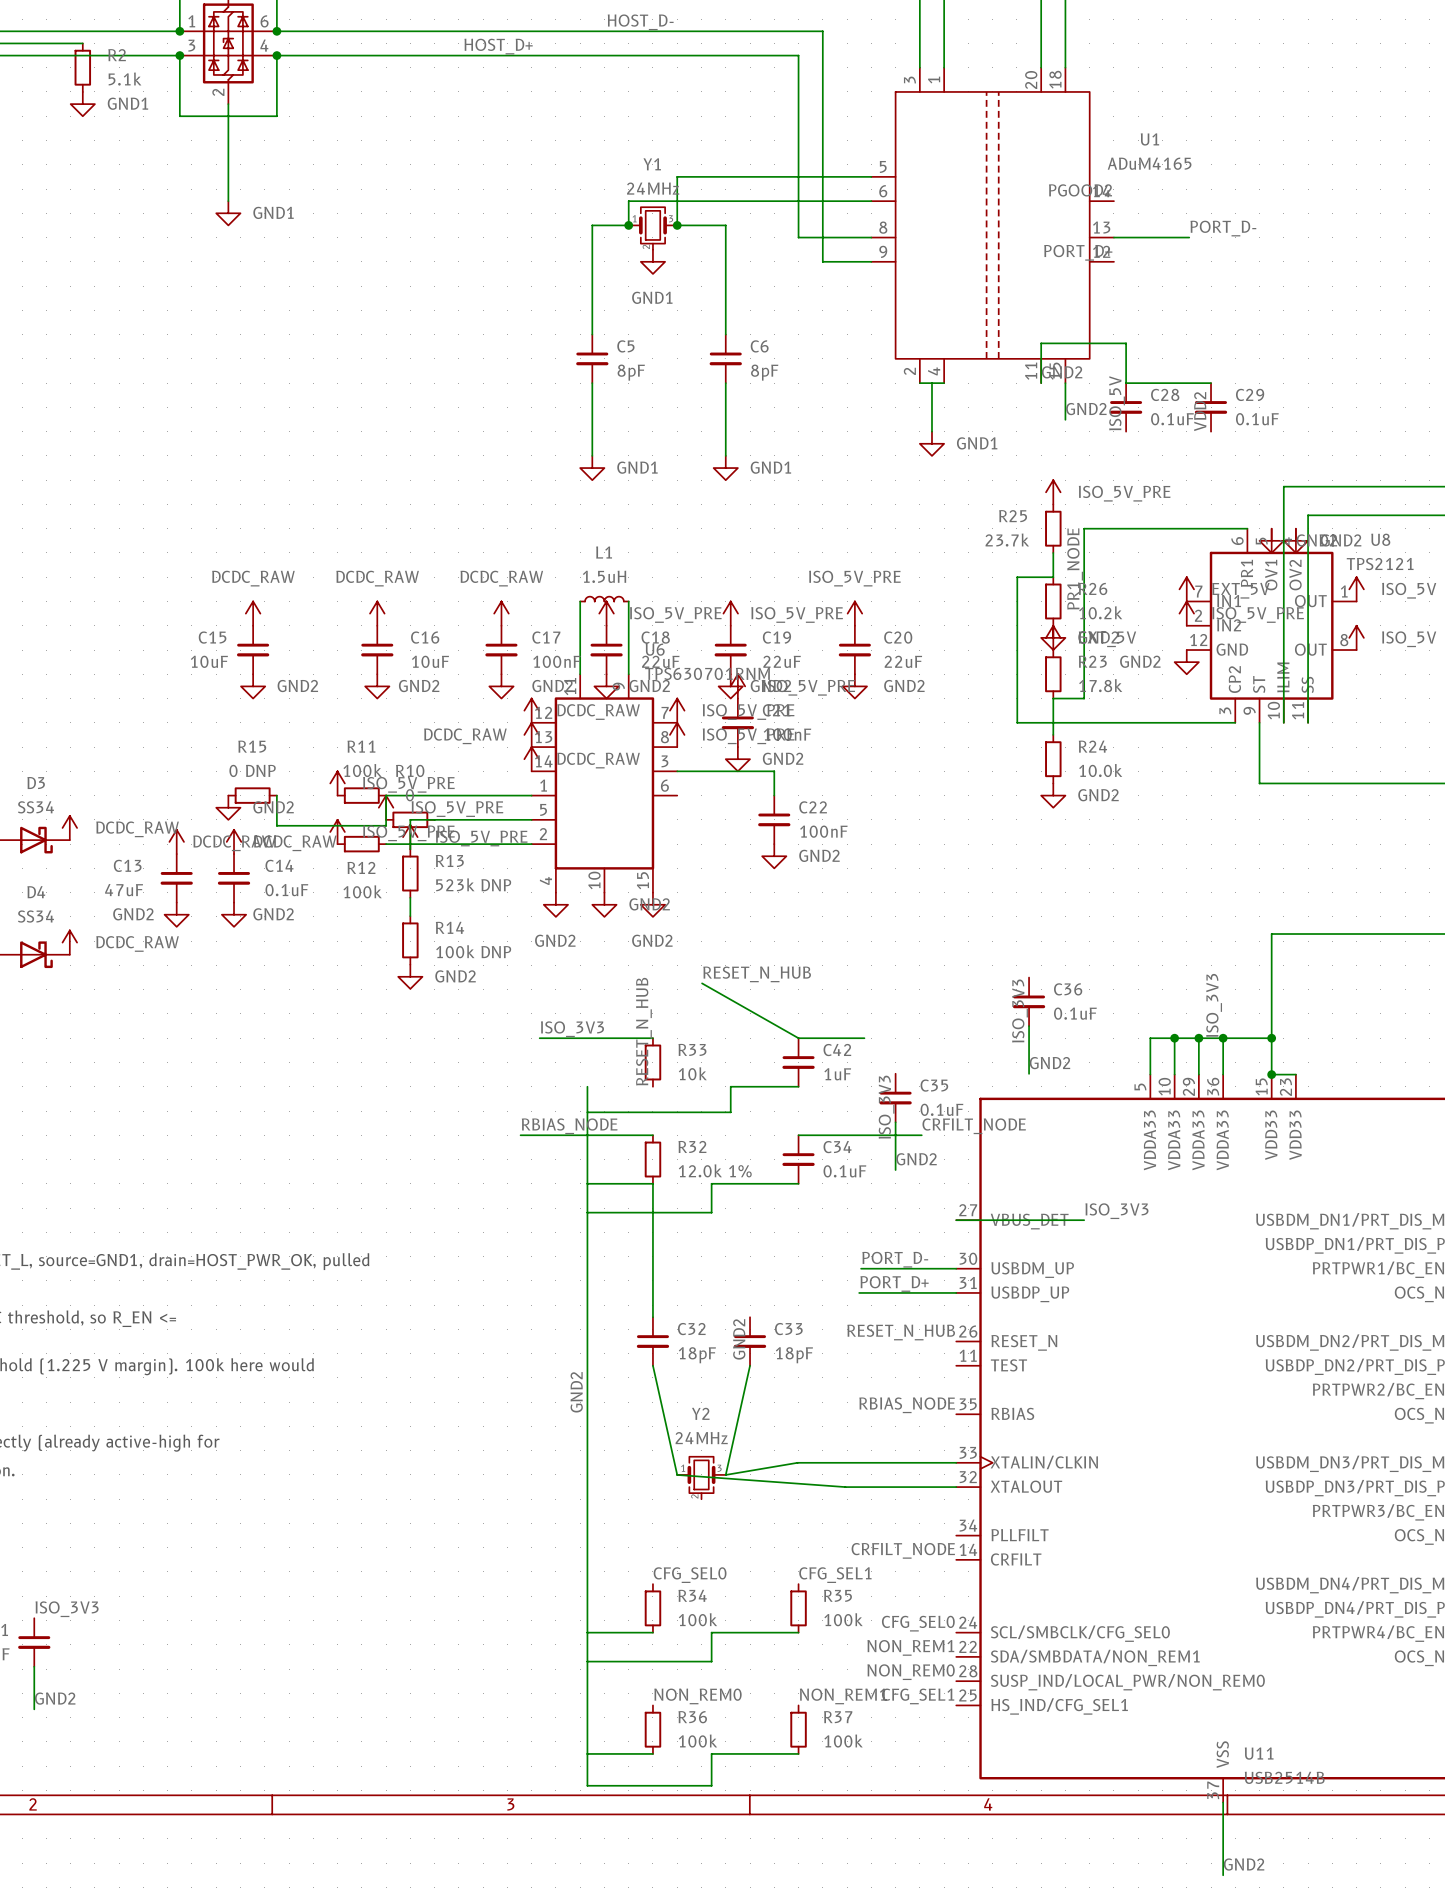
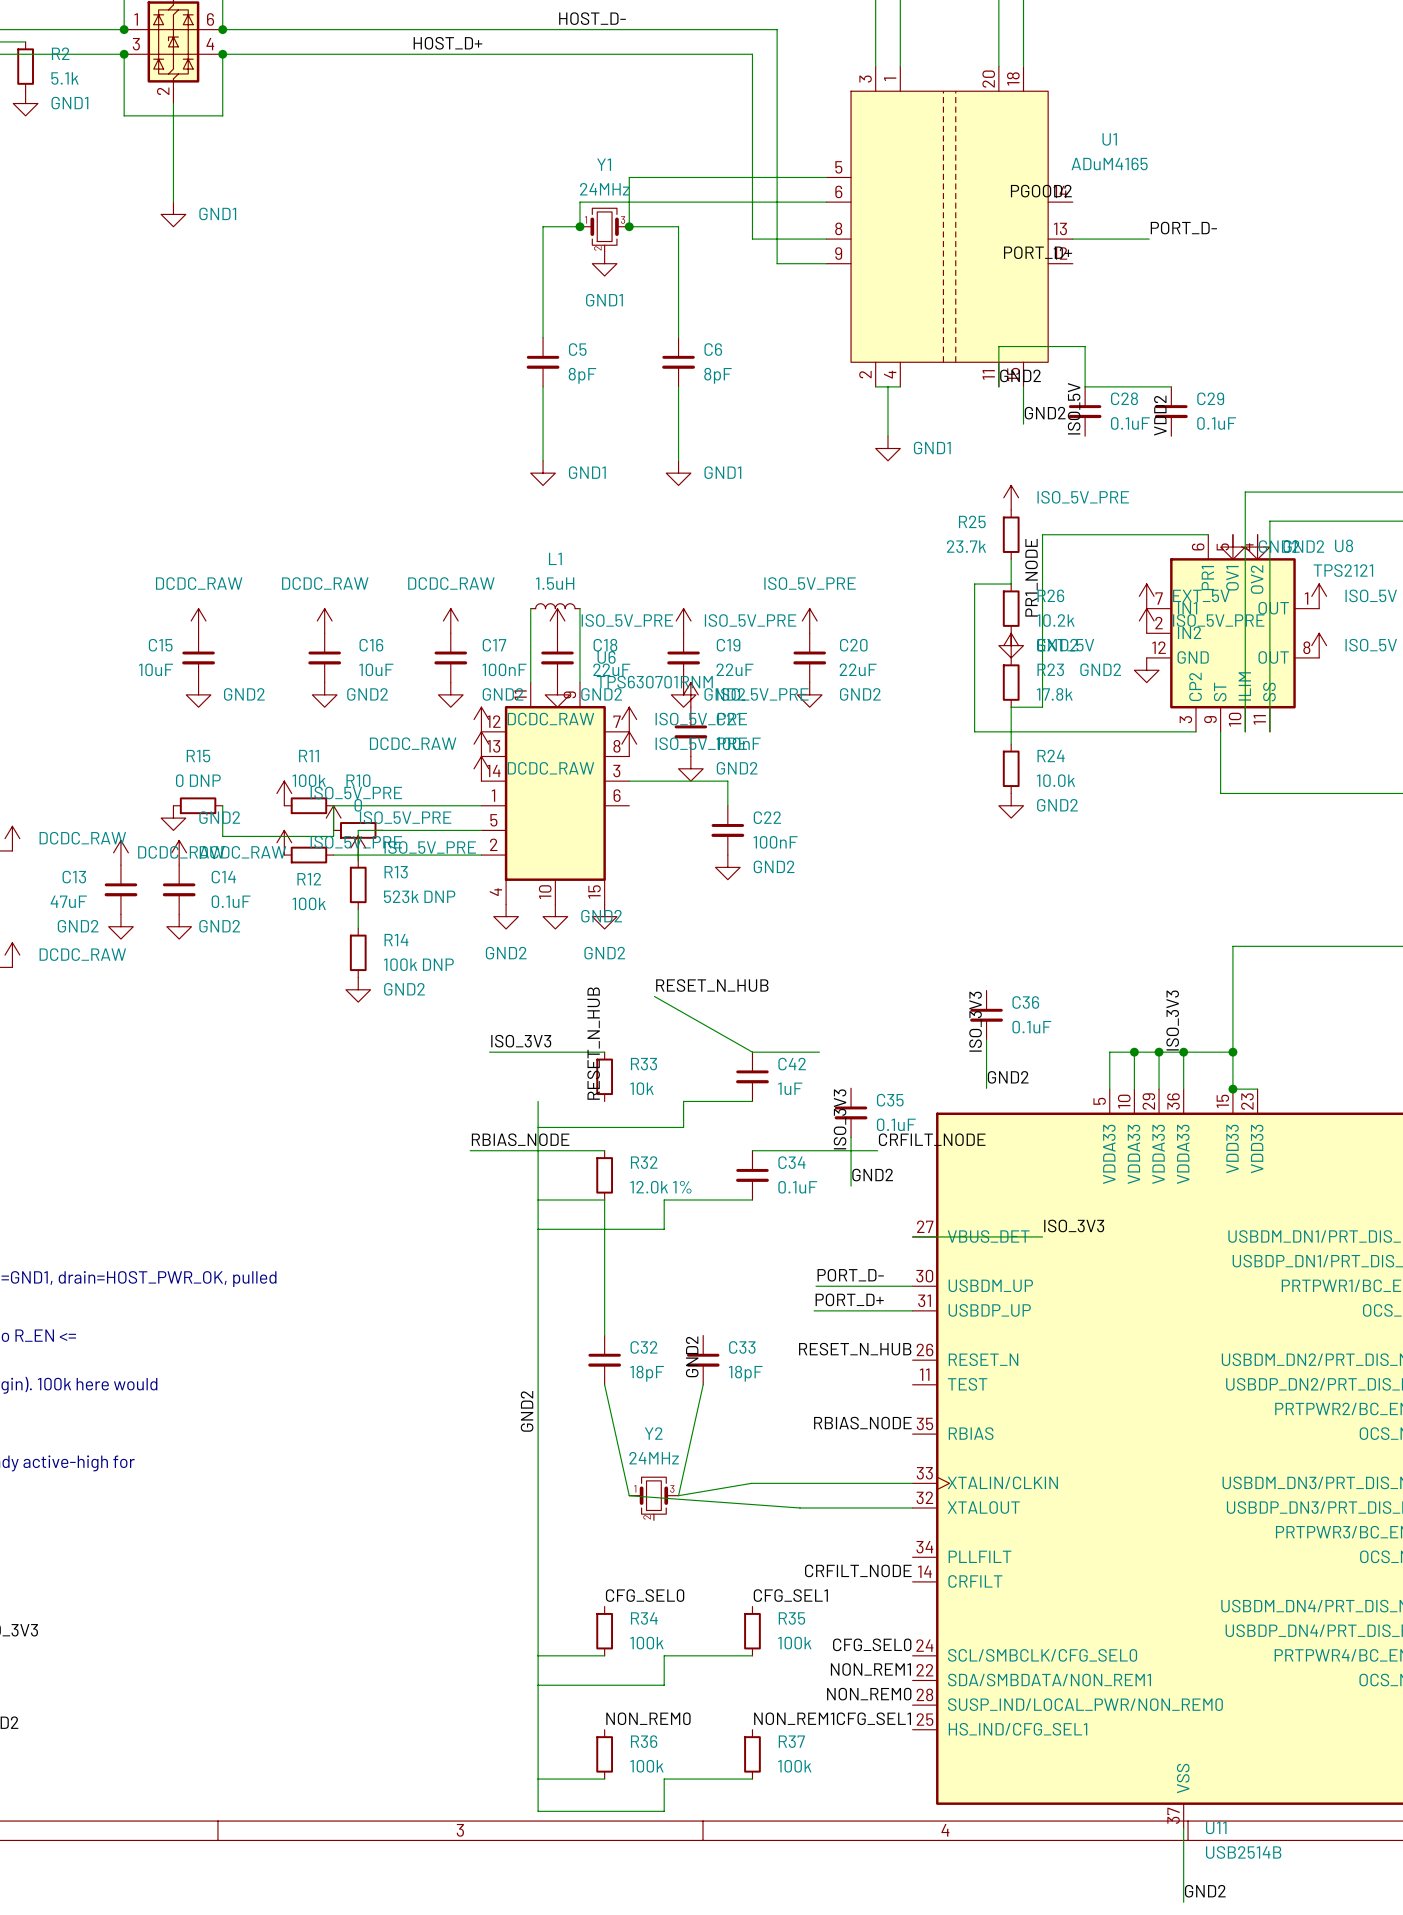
U11 name position: U11 (1259, 1753) -> U11 (1216, 1827)
U11 value position: USB2514B (1284, 1777) -> USB2514B (1243, 1852)

